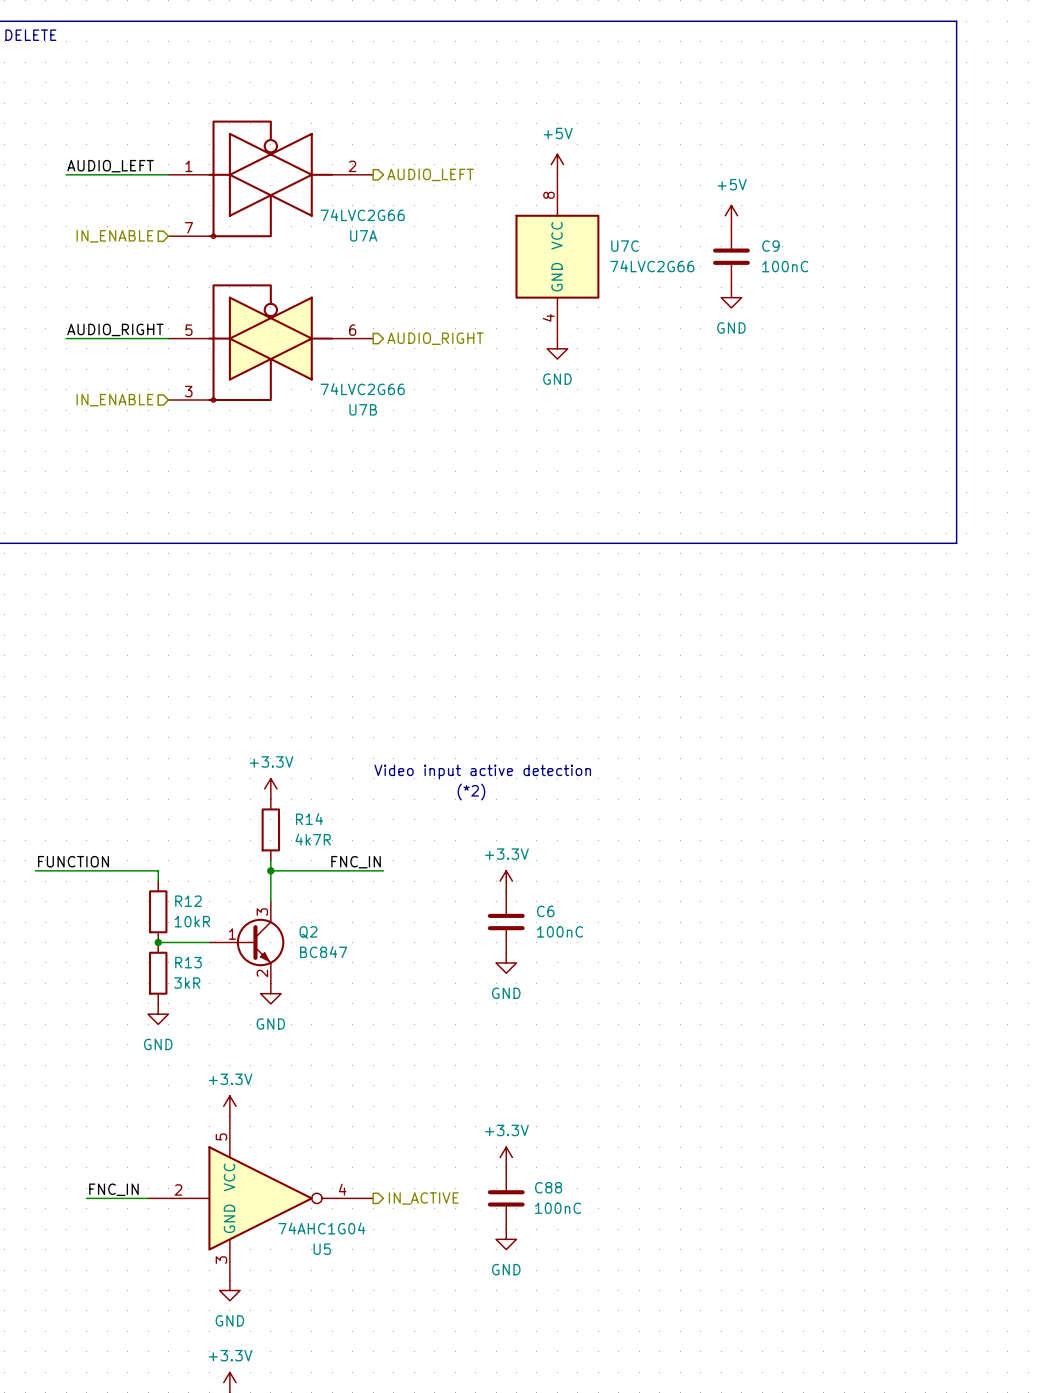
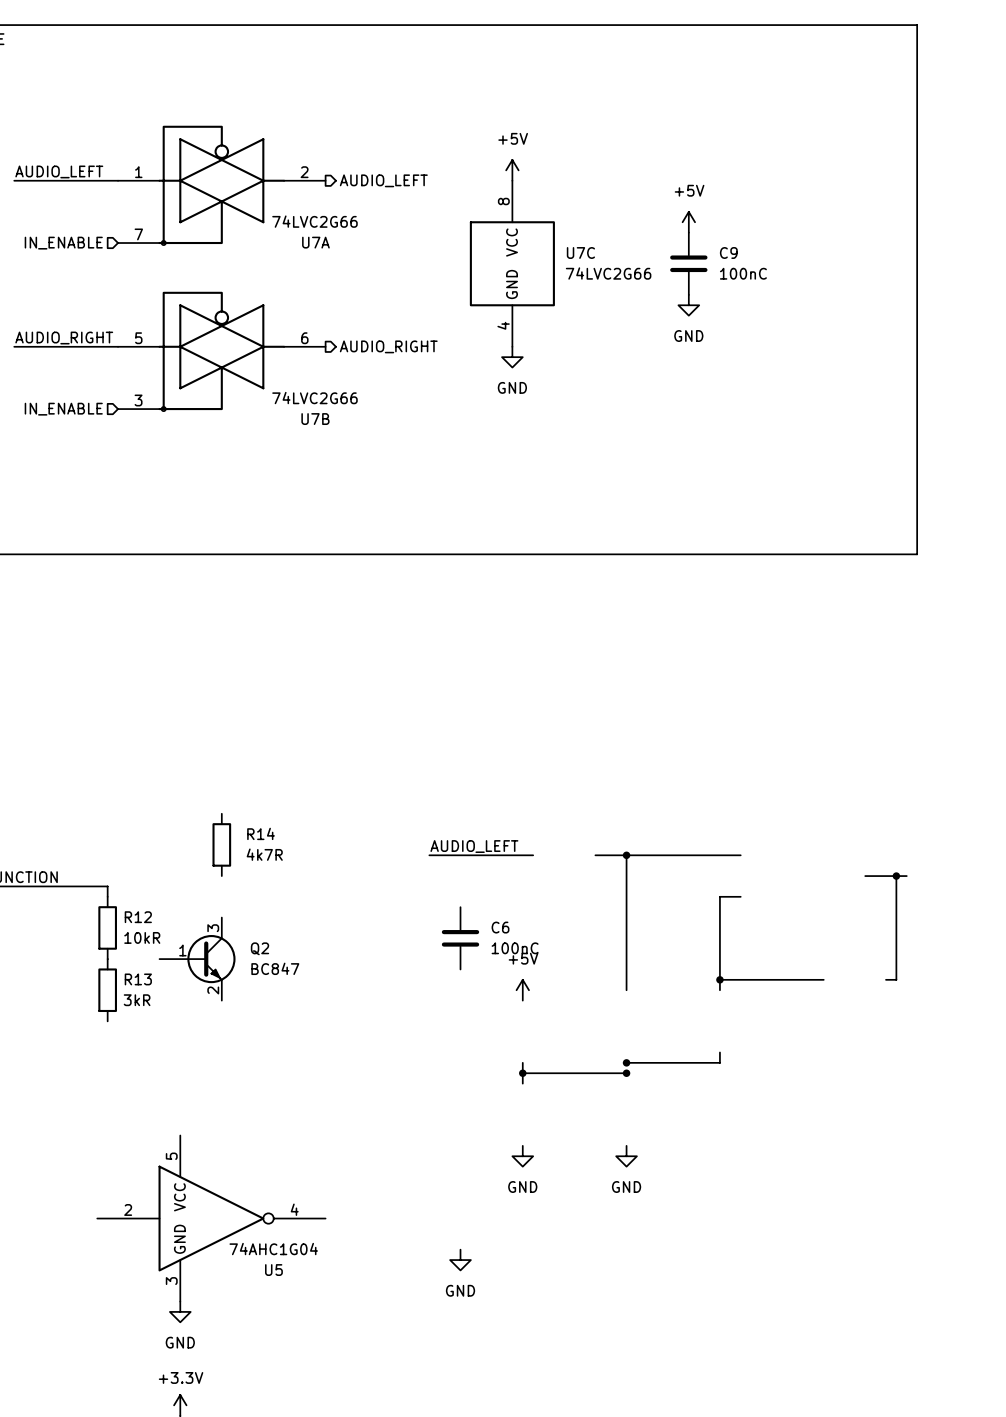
text: Video input active detection (482, 772) -> none
power symbol: +3.3V (270, 788) -> none
text: (*2) (471, 792) -> none
label: none -> AUDIO_LEFT (474, 846)
wire: none -> (429, 855) (533, 855)
wire: none -> (595, 855) (740, 855)
wire: none -> (626, 855) (626, 990)
junction: none -> (626, 855)
wire: (270, 860) (270, 901) -> none
wire: none -> (865, 876) (906, 876)
wire: none -> (896, 876) (896, 979) (886, 979)
junction: none -> (896, 876)
label: FNC_IN (356, 862) -> none
wire: (270, 870) (383, 870) -> none
junction: (270, 870) -> none
power symbol: +3.3V (506, 881) -> none
wire: none -> (740, 896) (719, 896) (719, 990)
wire: (158, 942) (209, 942) -> none
junction: (158, 942) -> none
power symbol: GND (506, 962) -> none
wire: none -> (719, 979) (823, 979)
junction: none -> (719, 979)
power symbol: none -> +5V (522, 990)
power symbol: GND (270, 993) -> none
power symbol: GND (158, 1014) -> none
wire: none -> (719, 1052) (719, 1062) (626, 1062)
wire: none -> (522, 1062) (522, 1083)
junction: none -> (626, 1062)
wire: none -> (522, 1073) (626, 1073)
junction: none -> (522, 1073)
junction: none -> (626, 1073)
power symbol: +3.3V (229, 1106) -> none
power symbol: none -> GND (522, 1156)
power symbol: none -> GND (626, 1156)
power symbol: +3.3V (506, 1157) -> none
label: FNC_IN (113, 1189) -> none
wire: (86, 1198) (148, 1198) -> none
hierarchical label: IN_ACTIVE (423, 1198) -> none
C88: 100nC (506, 1198) -> none

